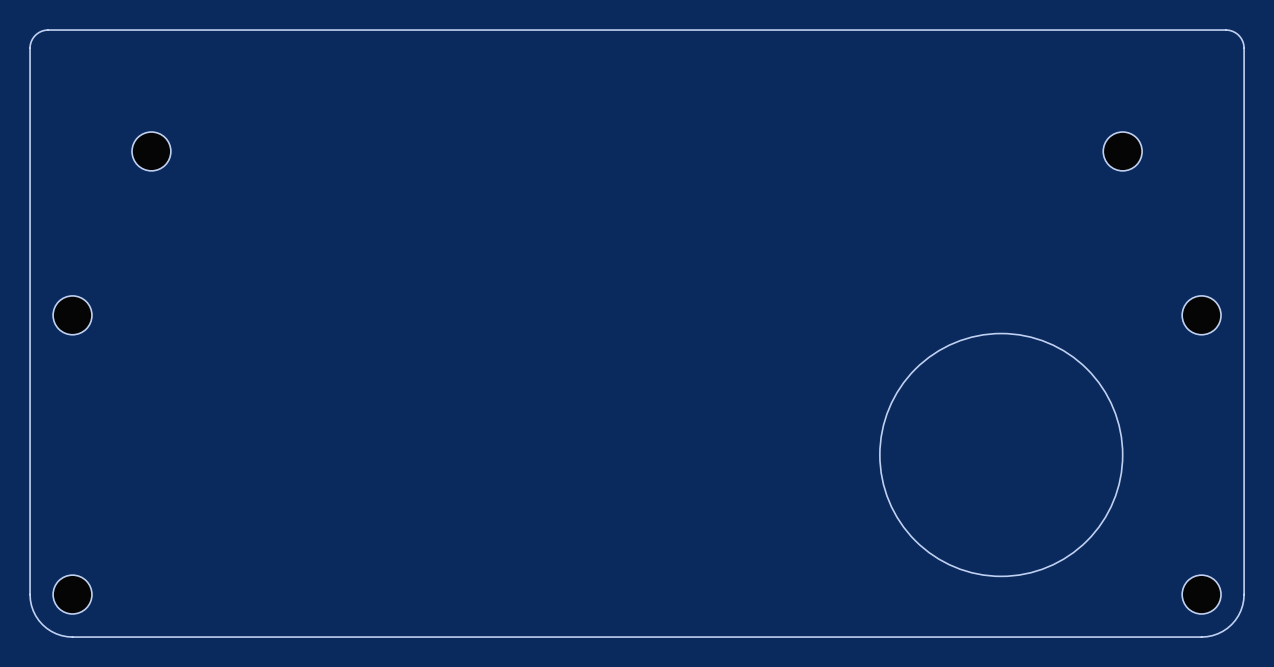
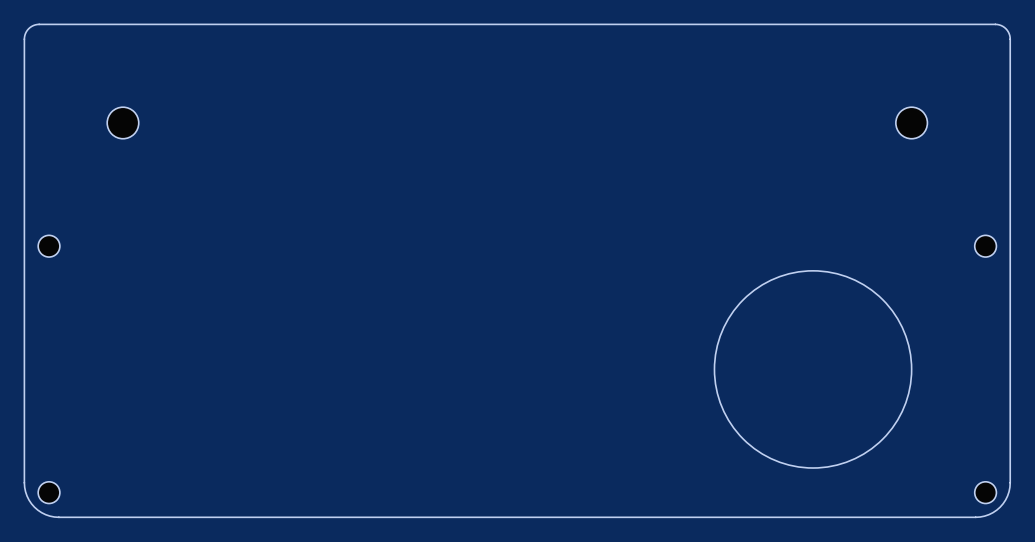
part: none -> (49, 246)
part: none -> (985, 246)
part: (72, 315) -> none
part: (1201, 315) -> none
part: (72, 594) -> none
part: (1201, 594) -> none
part: none -> (49, 492)
part: none -> (985, 492)

